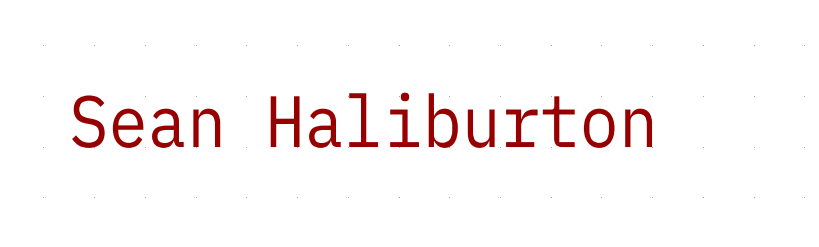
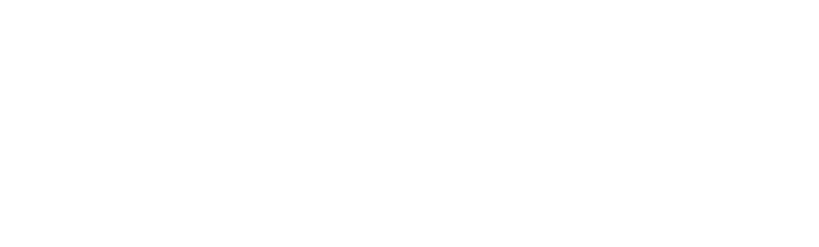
text: Sean Haliburton (362, 120) -> none

